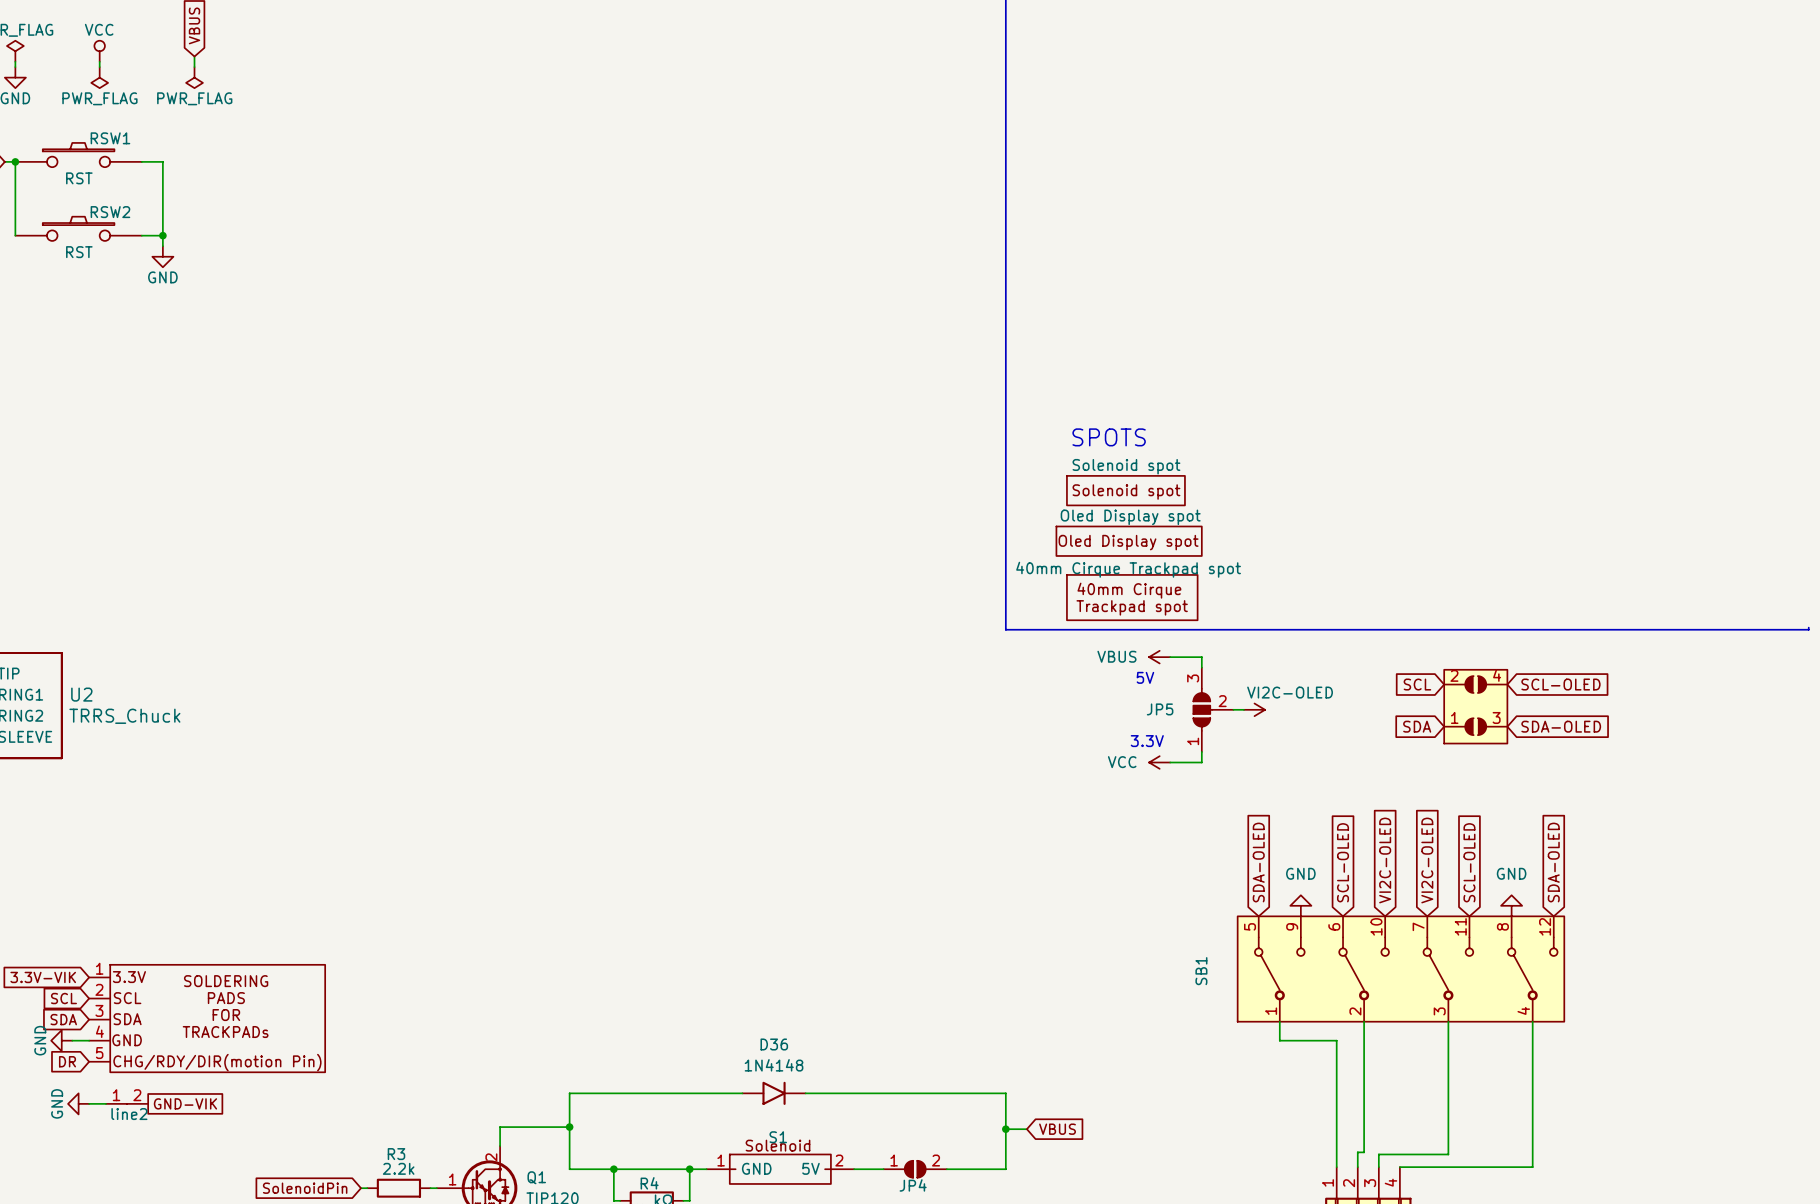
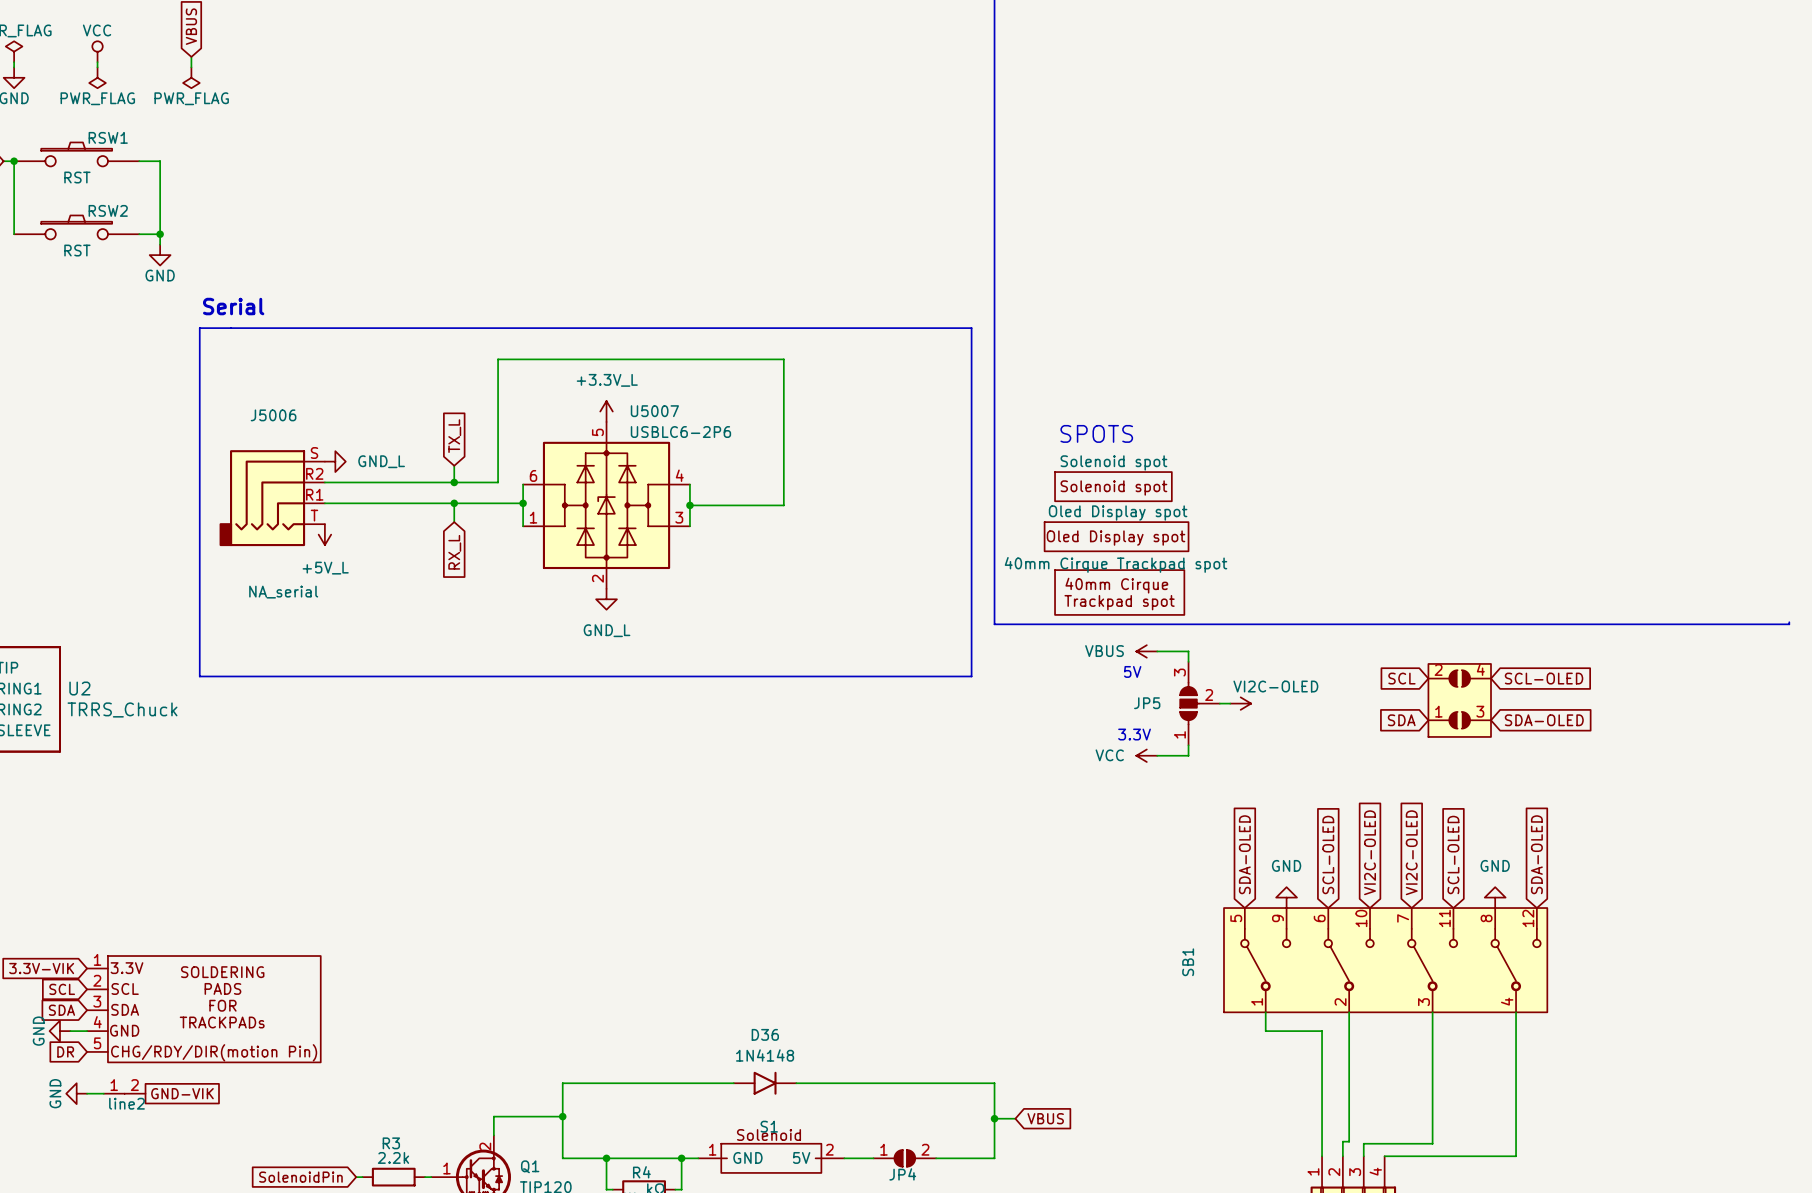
text: none -> Serial (233, 306)
line: none -> (199, 328) (971, 328) (971, 676) (199, 676) (199, 328)
power symbol: none -> +3.3V_L (606, 411)
global label: none -> TX_L (454, 436)
power symbol: none -> GND_L (335, 461)
wire: none -> (454, 465) (454, 482)
wire: none -> (324, 482) (498, 482) (498, 359) (783, 359) (783, 505) (689, 505)
junction: none -> (454, 482)
wire: none -> (523, 484) (523, 526)
wire: none -> (689, 484) (689, 526)
J5006: none -> NA_serial (272, 498)
wire: none -> (324, 503) (523, 503)
wire: none -> (454, 503) (454, 522)
junction: none -> (454, 503)
junction: none -> (523, 503)
U5007: none -> USBLC6-2P6 (606, 505)
junction: none -> (689, 505)
power symbol: none -> +5V_L (324, 534)
global label: none -> RX_L (454, 552)
power symbol: none -> GND_L (606, 599)

